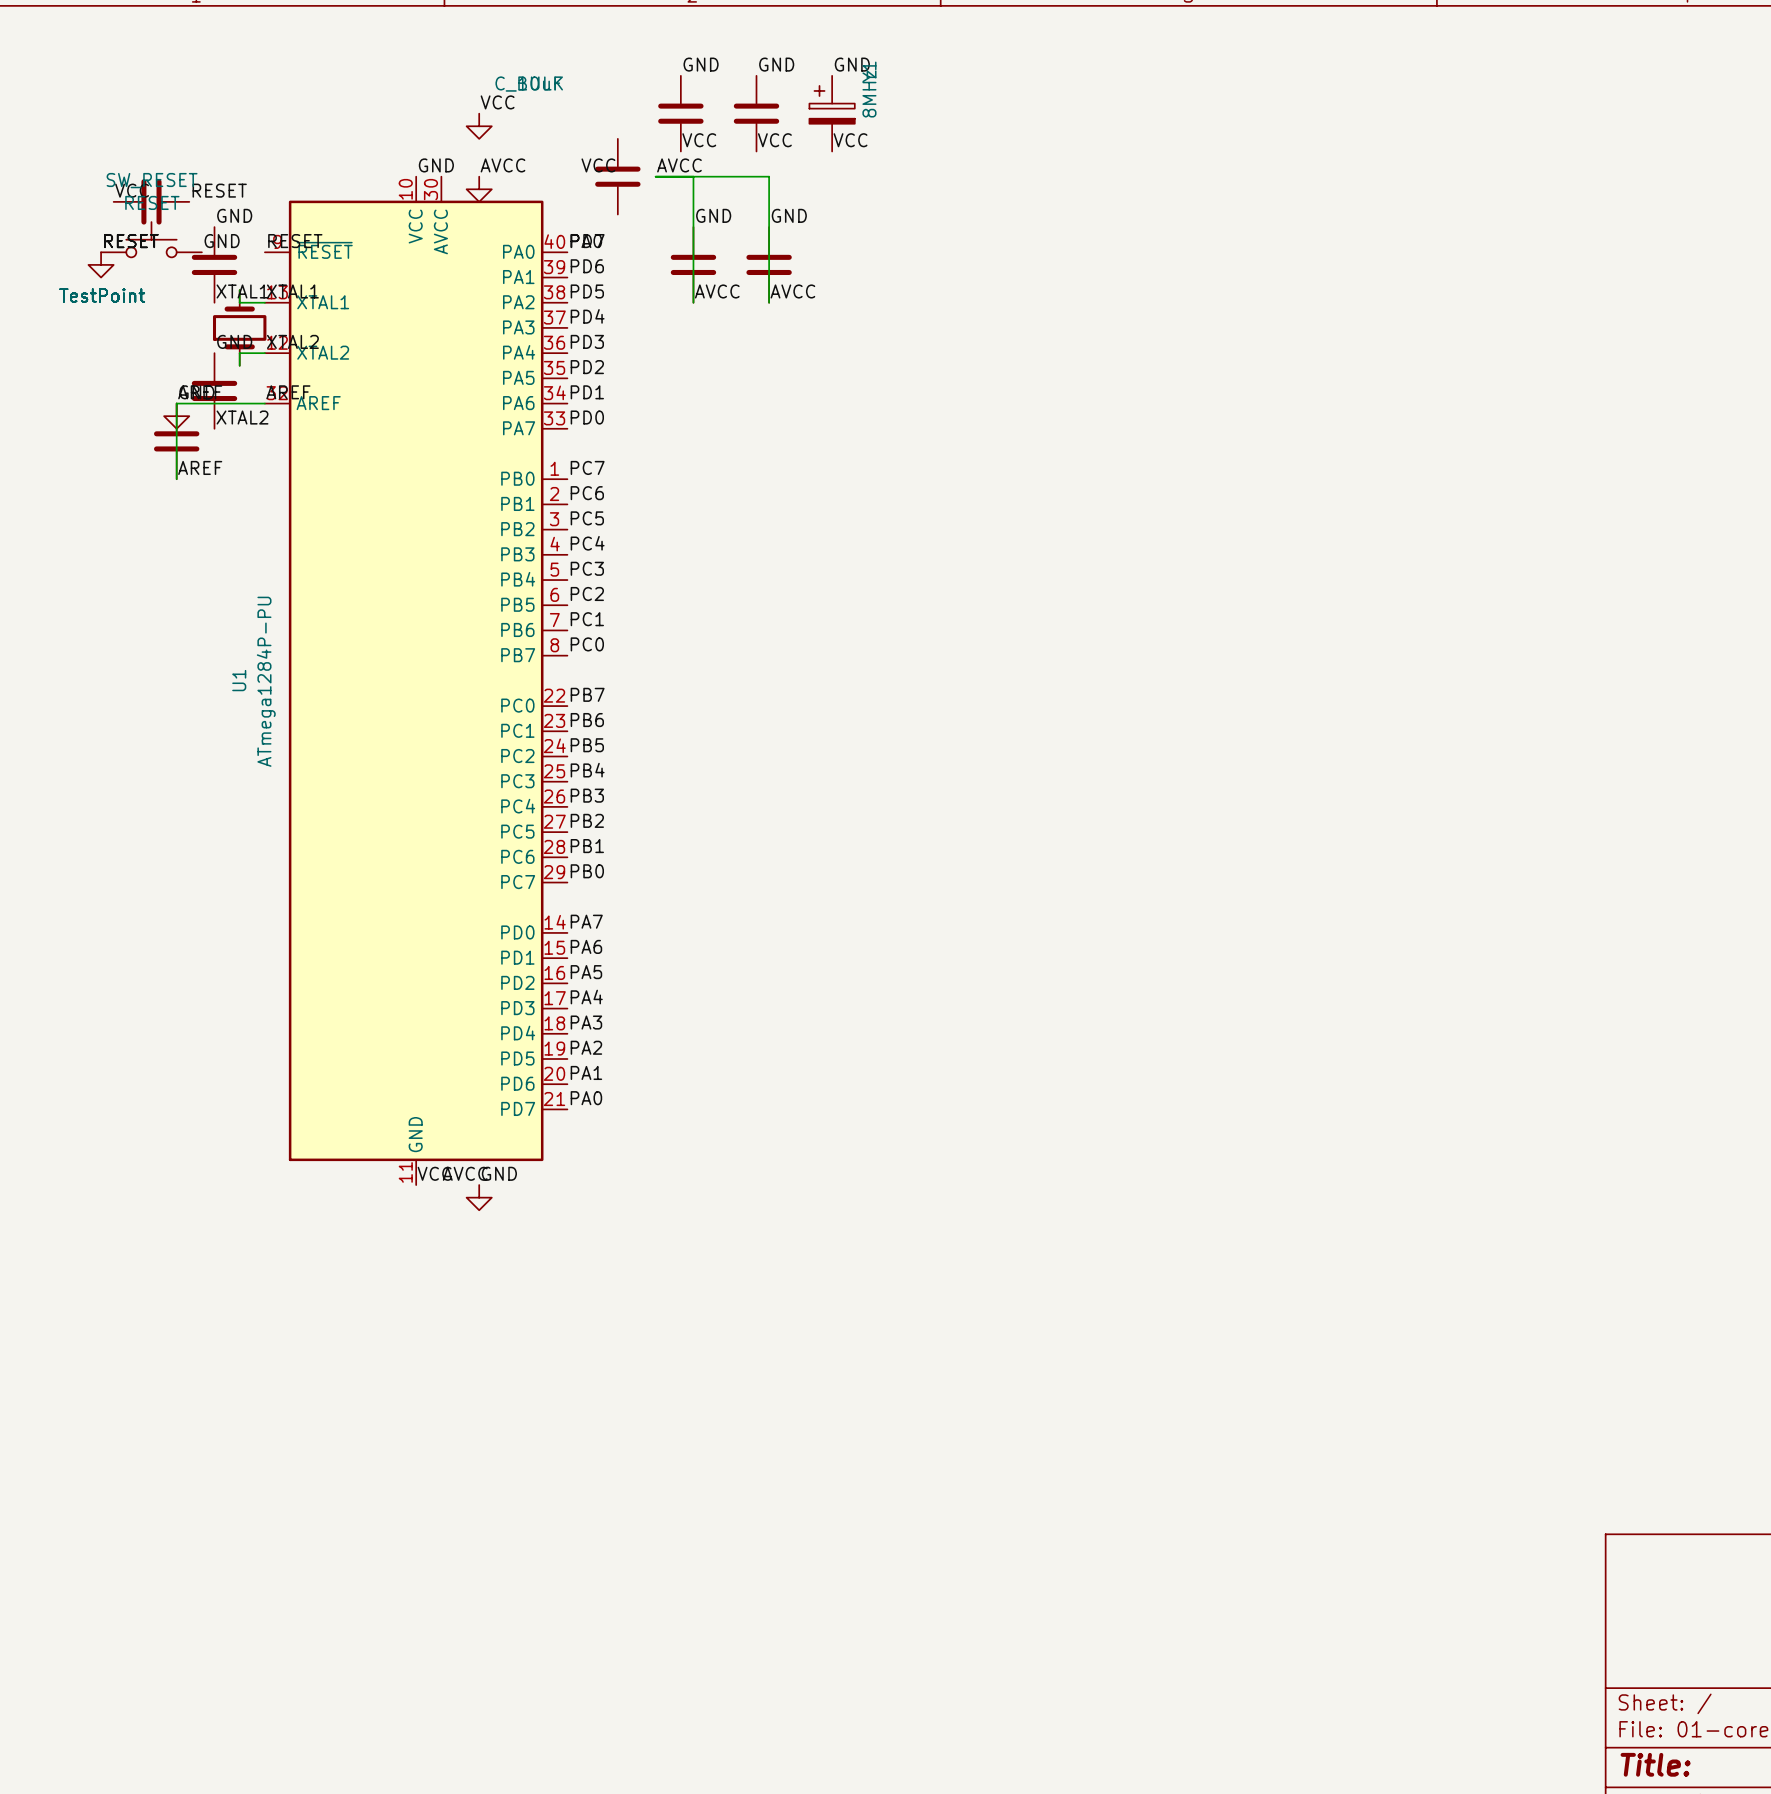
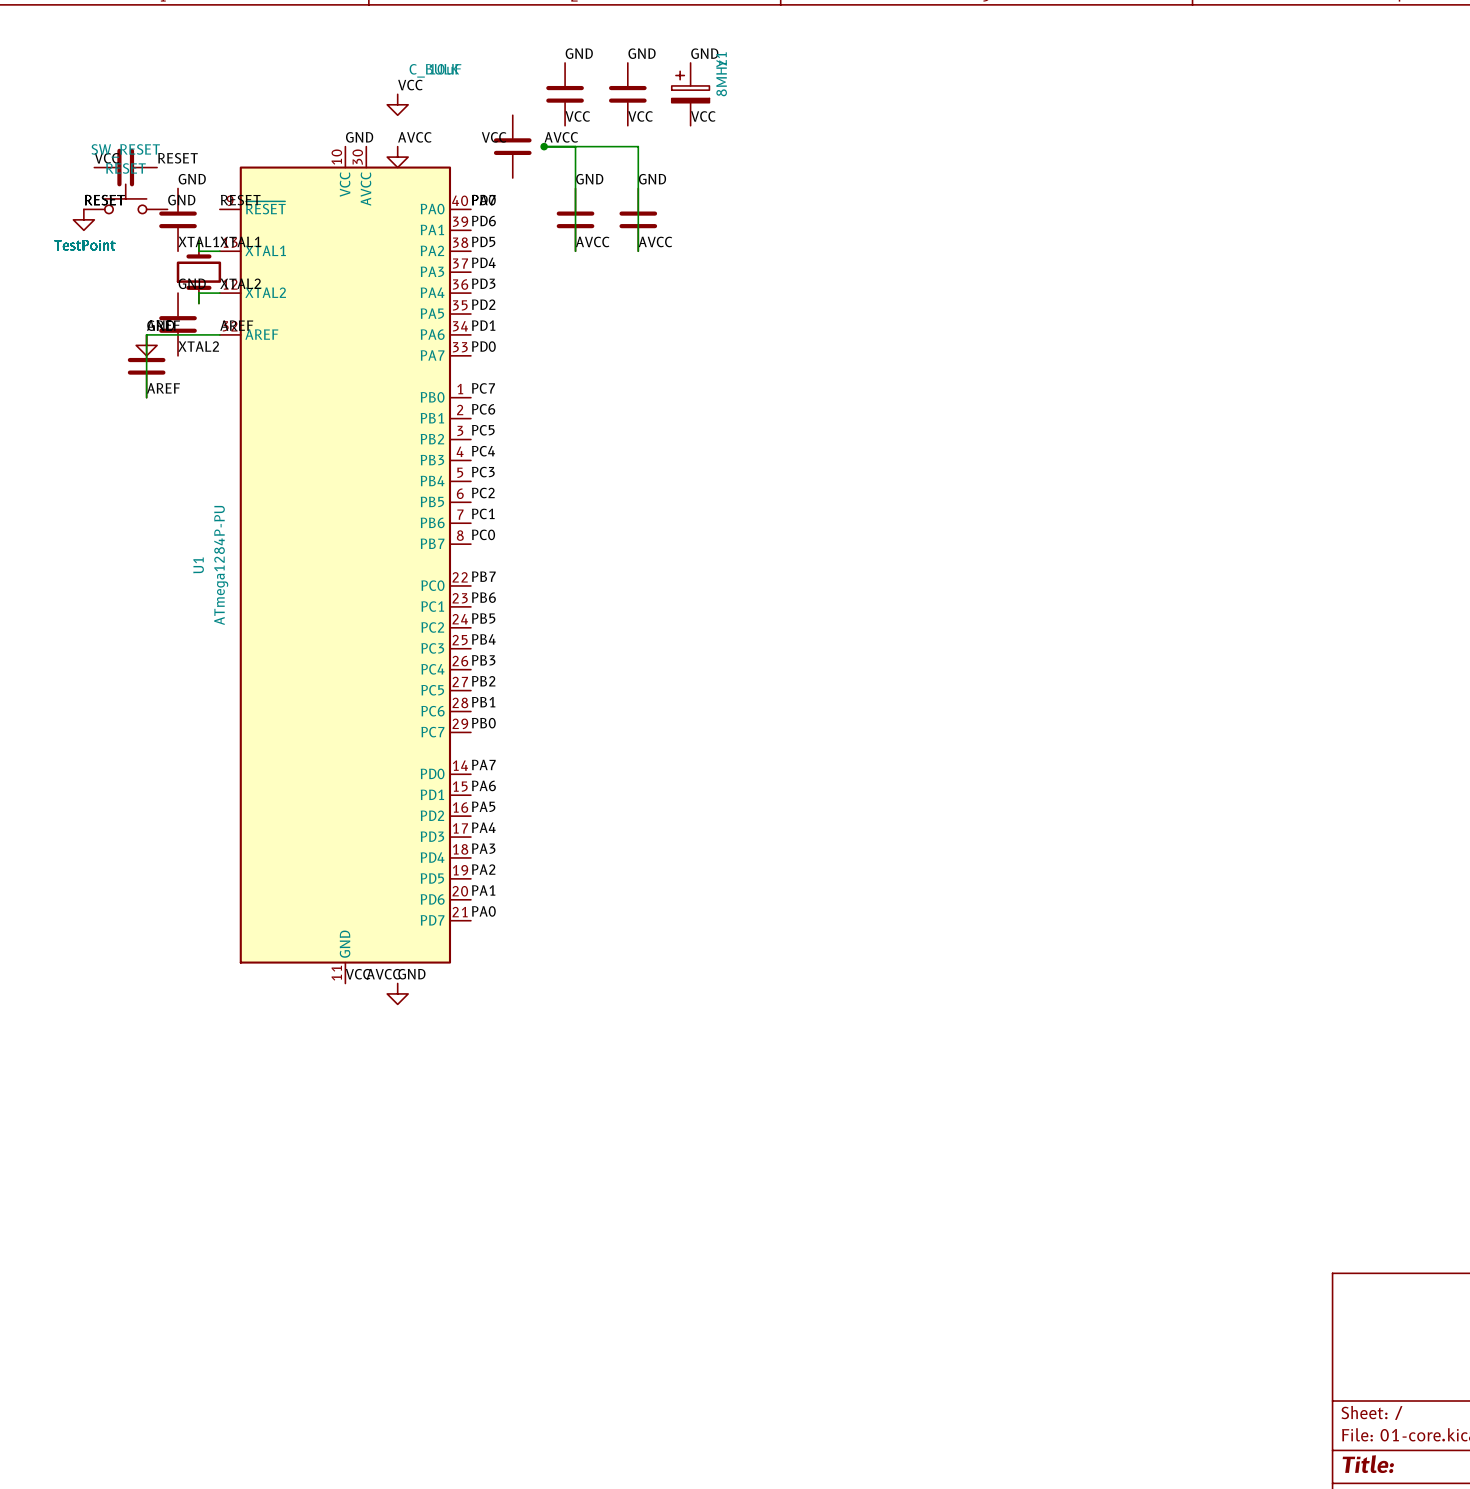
junction: none -> (544, 146)

